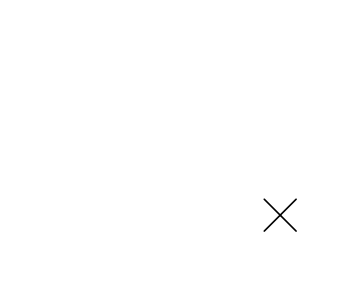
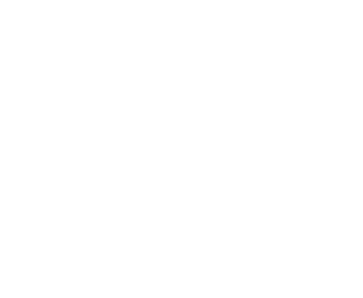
no-connect mark: (280, 215) -> none

